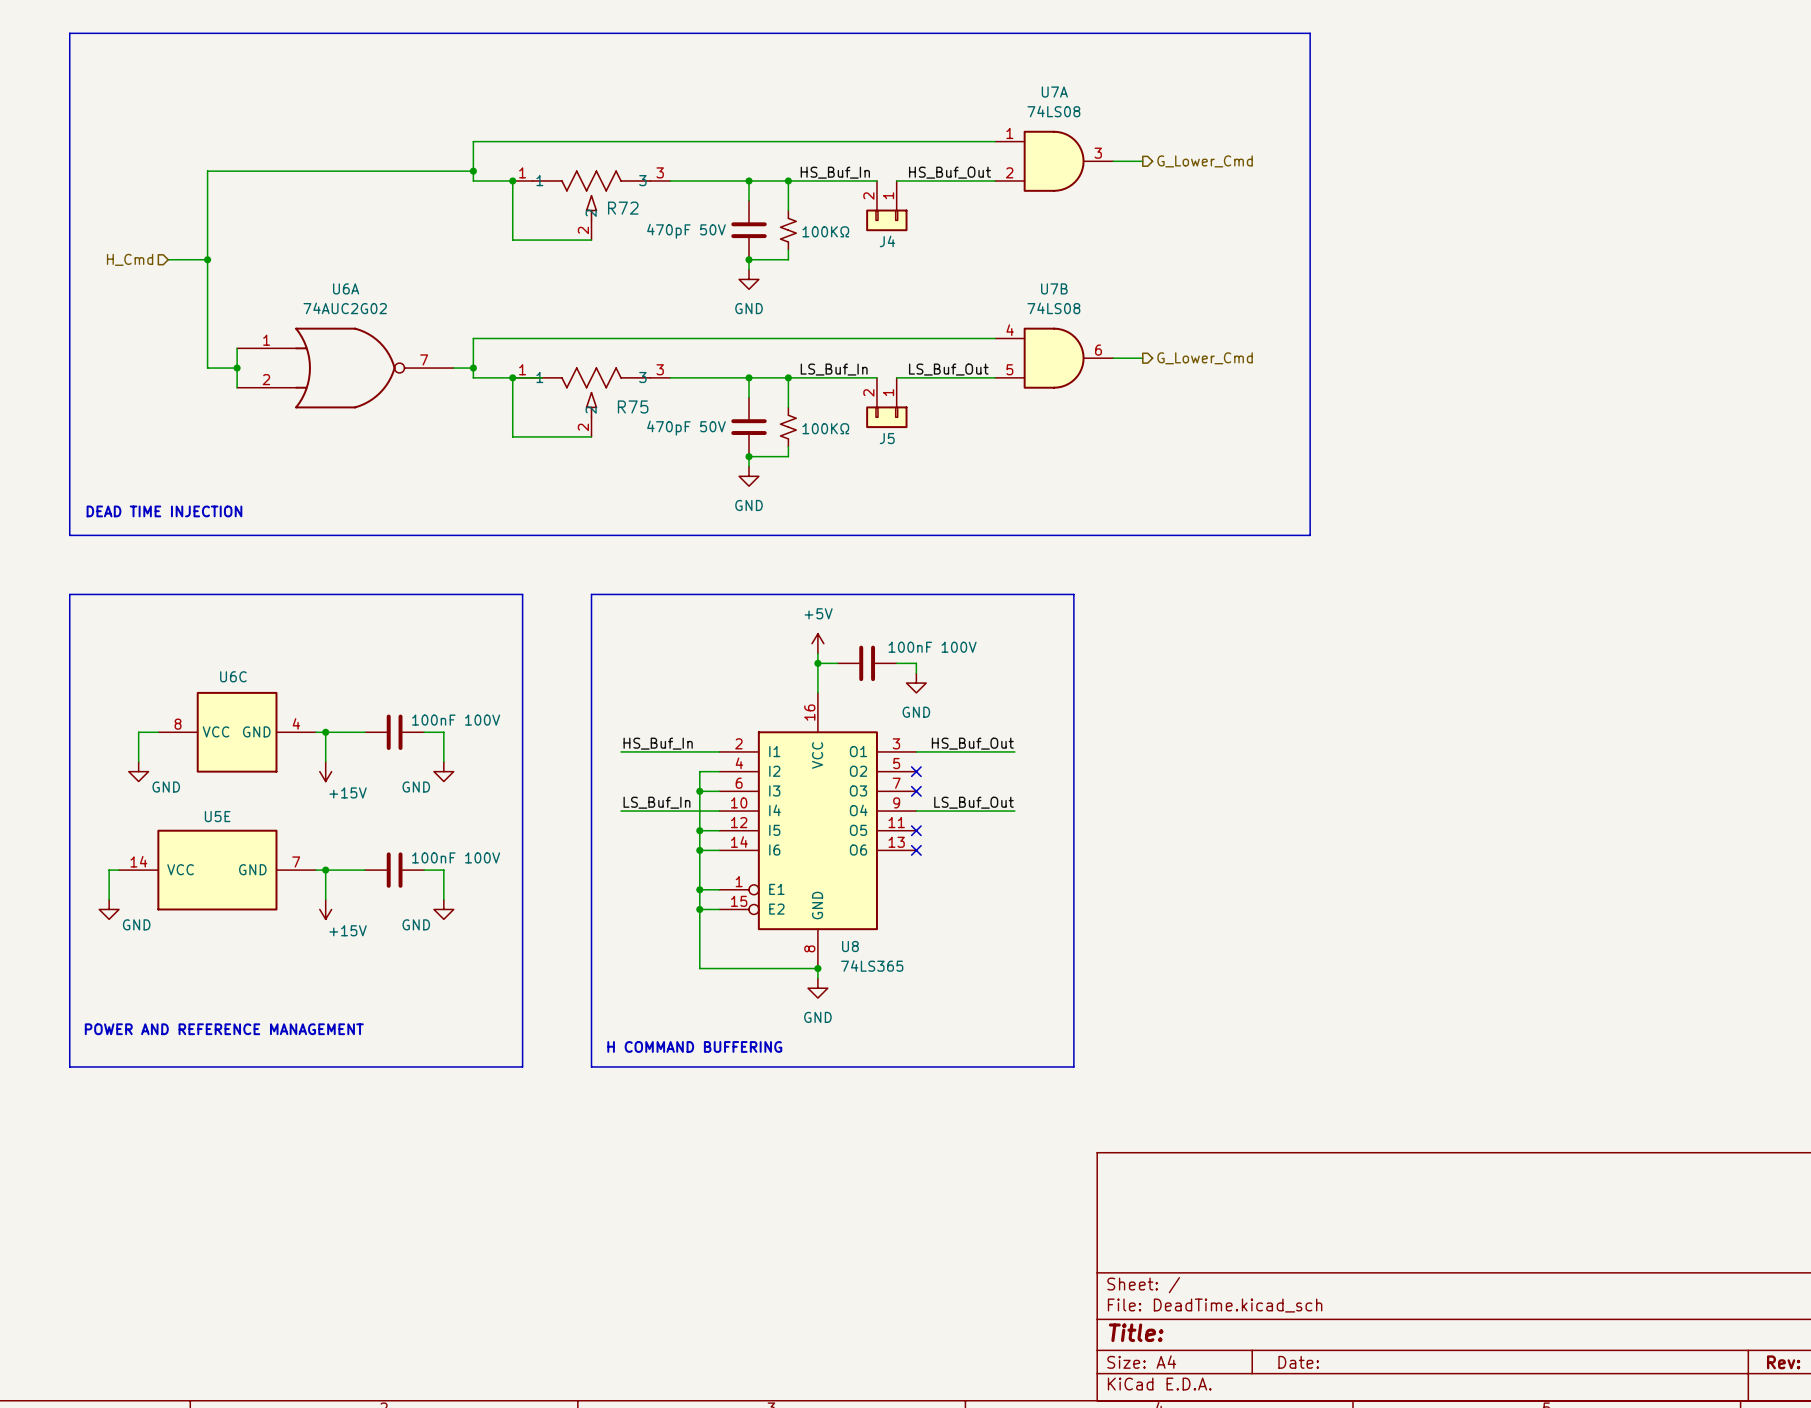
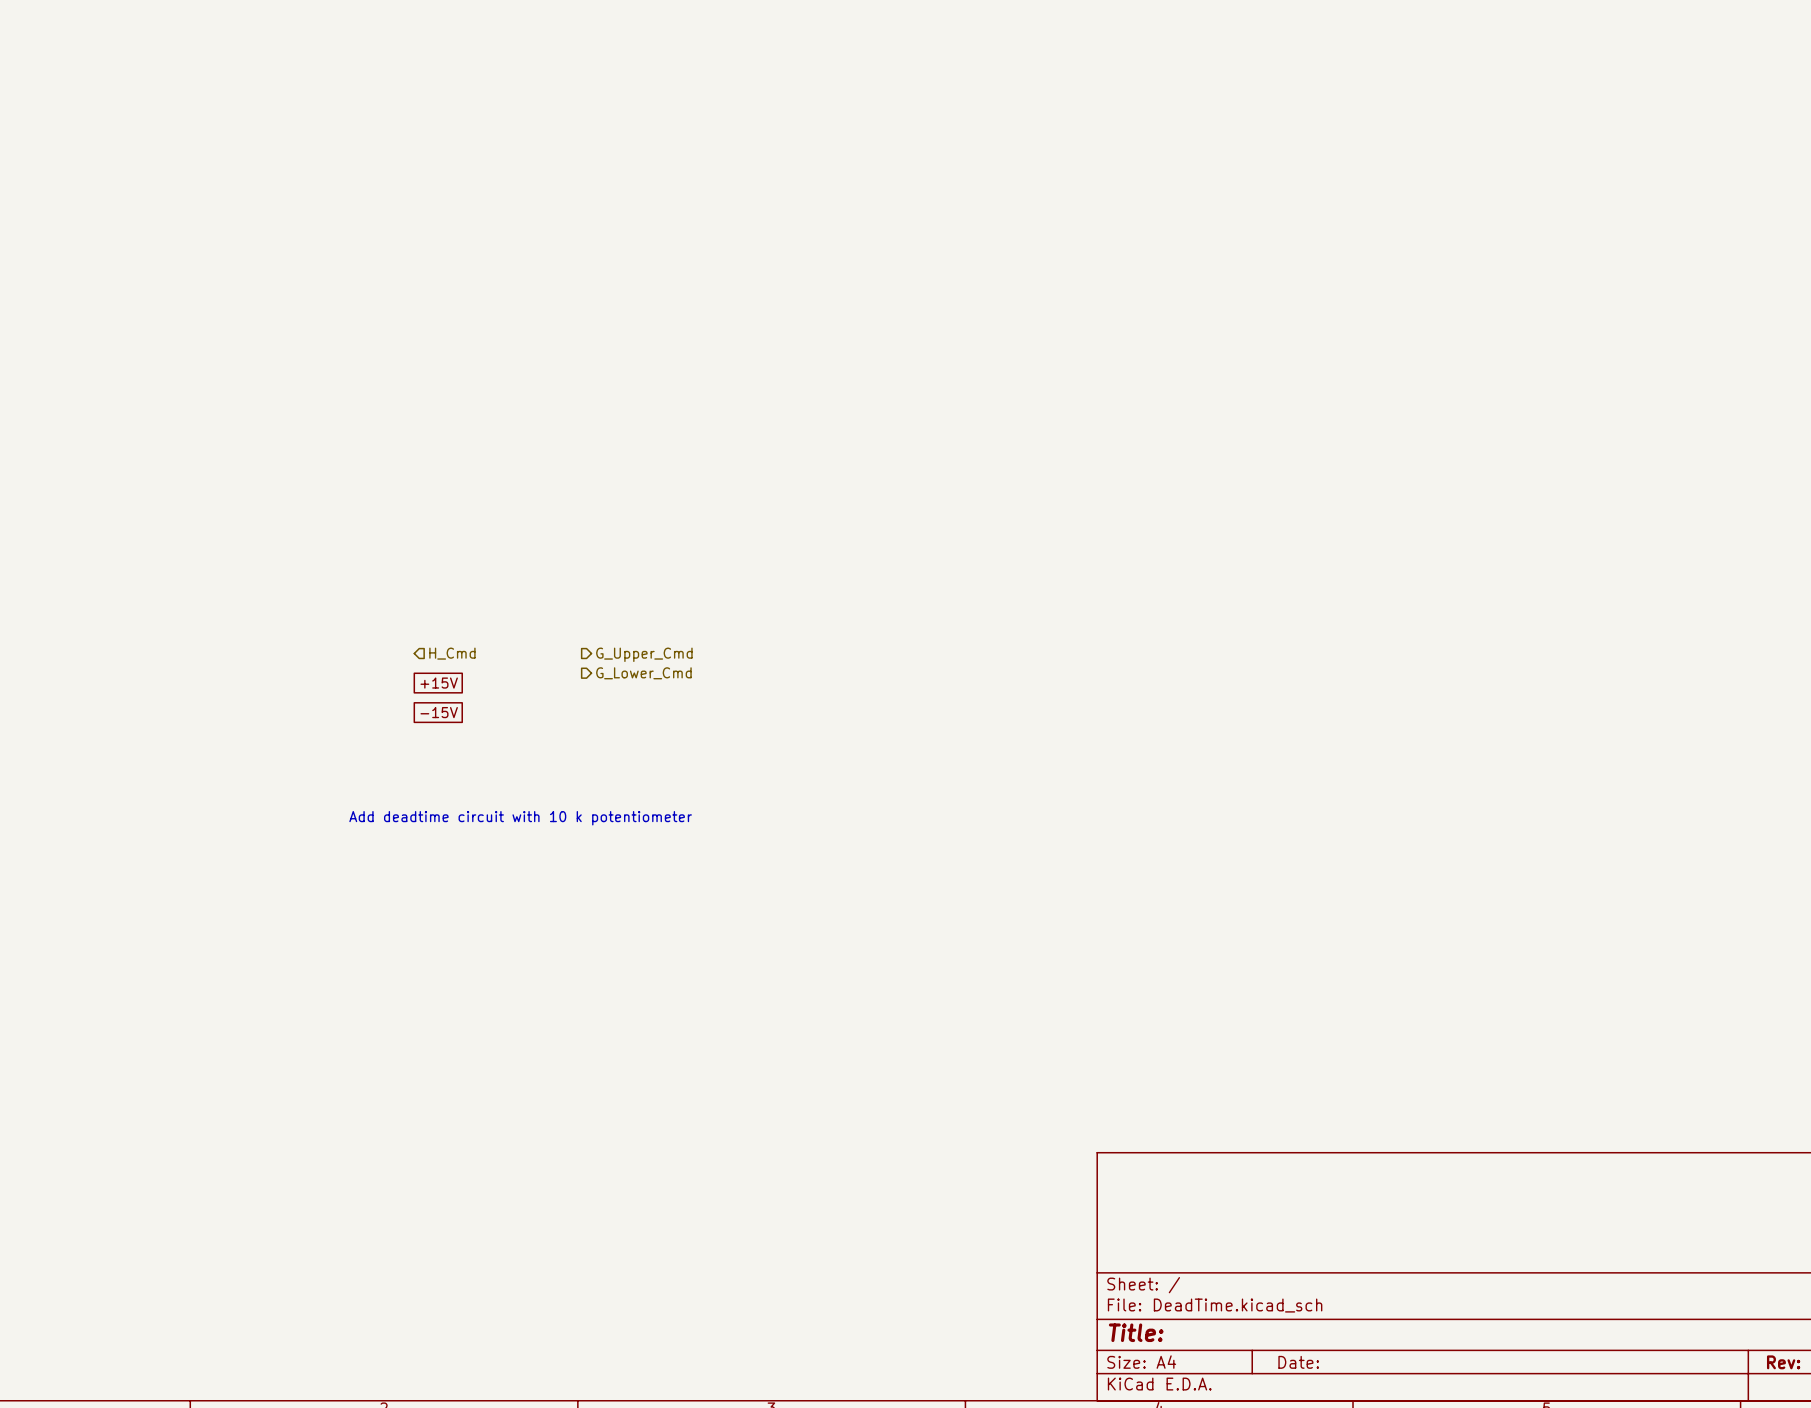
line: (69, 33) (1310, 33) (1310, 535) (69, 535) (69, 33) -> none
wire: (995, 141) (473, 141) (473, 180) (512, 180) (512, 240) (591, 240) -> none
U7A: 74LS08 (1054, 161) -> none
wire: (1113, 161) (1142, 161) -> none
hierarchical label: G_Lower_Cmd (1205, 161) -> none
wire: (473, 171) (207, 171) (207, 368) (237, 368) -> none
junction: (473, 171) -> none
label: HS_Buf_In (835, 172) -> none
label: HS_Buf_Out (949, 172) -> none
junction: (512, 180) -> none
wire: (670, 180) (876, 180) -> none
wire: (749, 180) (749, 200) -> none
junction: (749, 180) -> none
wire: (788, 180) (788, 210) -> none
junction: (788, 180) -> none
wire: (896, 180) (995, 180) -> none
R72: (591, 205) -> none
J4: (886, 206) -> none
part: 470pF 50V (749, 230) -> none
part: 100KΩ (788, 230) -> none
wire: (788, 249) (788, 259) (749, 259) (749, 269) -> none
hierarchical label: H_Cmd (130, 259) -> none
wire: (168, 259) (207, 259) -> none
junction: (207, 259) -> none
junction: (749, 259) -> none
power symbol: GND (749, 279) -> none
wire: (995, 338) (473, 338) (473, 377) (542, 377) -> none
wire: (237, 348) (237, 387) -> none
U7B: 74LS08 (1054, 358) -> none
wire: (1113, 358) (1142, 358) -> none
hierarchical label: G_Lower_Cmd (1205, 358) -> none
junction: (237, 368) -> none
U6A: 74AUC2G02 (345, 368) -> none
wire: (453, 368) (473, 368) -> none
junction: (473, 368) -> none
label: LS_Buf_In (834, 369) -> none
label: LS_Buf_Out (948, 369) -> none
wire: (512, 377) (512, 436) (591, 436) -> none
junction: (512, 377) -> none
wire: (670, 377) (876, 377) -> none
wire: (749, 377) (749, 397) -> none
junction: (749, 377) -> none
wire: (788, 377) (788, 407) -> none
junction: (788, 377) -> none
wire: (896, 377) (995, 377) -> none
R75: (591, 402) -> none
J5: (886, 402) -> none
part: 470pF 50V (749, 427) -> none
part: 100KΩ (788, 427) -> none
wire: (788, 446) (788, 456) (749, 456) (749, 466) -> none
junction: (749, 456) -> none
power symbol: GND (749, 476) -> none
text: DEAD TIME INJECTION (164, 511) -> none
line: (69, 594) (69, 1066) (522, 1066) (522, 594) (69, 594) -> none
line: (591, 594) (1073, 594) (1073, 1066) (591, 1066) (591, 594) -> none
power symbol: +5V (817, 643) -> none
hierarchical label: none -> H_Cmd (452, 653)
wire: (817, 653) (817, 692) -> none
hierarchical label: none -> G_Upper_Cmd (644, 654)
wire: (817, 663) (837, 663) -> none
junction: (817, 663) -> none
part: 100nF 100V (867, 663) -> none
wire: (896, 663) (916, 663) (916, 673) -> none
hierarchical label: none -> G_Lower_Cmd (643, 673)
global label: none -> +15V (439, 683)
power symbol: GND (916, 683) -> none
global label: none -> -15V (439, 712)
wire: (158, 732) (138, 732) (138, 761) -> none
U6C: (237, 732) -> none
wire: (315, 732) (365, 732) -> none
wire: (325, 732) (325, 761) -> none
junction: (325, 732) -> none
part: 100nF 100V (394, 732) -> none
wire: (424, 732) (443, 732) (443, 761) -> none
label: HS_Buf_In (658, 743) -> none
label: HS_Buf_Out (972, 743) -> none
wire: (621, 751) (719, 751) -> none
wire: (916, 751) (1014, 751) -> none
power symbol: GND (138, 771) -> none
power symbol: +15V (325, 771) -> none
power symbol: GND (443, 771) -> none
wire: (719, 771) (699, 771) (699, 968) (817, 968) (817, 978) -> none
no-connect mark: (916, 771) -> none
wire: (699, 791) (719, 791) -> none
junction: (699, 791) -> none
no-connect mark: (916, 791) -> none
label: LS_Buf_In (656, 802) -> none
label: LS_Buf_Out (973, 802) -> none
wire: (621, 811) (719, 811) -> none
wire: (916, 811) (1014, 811) -> none
text: none -> Add deadtime circuit with 10 k potentiometer (520, 818)
wire: (699, 830) (719, 830) -> none
junction: (699, 830) -> none
U8: 74LS365 (817, 830) -> none
no-connect mark: (916, 830) -> none
wire: (699, 850) (719, 850) -> none
junction: (699, 850) -> none
no-connect mark: (916, 850) -> none
wire: (118, 870) (109, 870) (109, 899) -> none
U5E: (217, 870) -> none
wire: (315, 870) (365, 870) -> none
wire: (325, 870) (325, 899) -> none
junction: (325, 870) -> none
part: 100nF 100V (394, 870) -> none
wire: (424, 870) (443, 870) (443, 899) -> none
wire: (699, 889) (719, 889) -> none
junction: (699, 889) -> none
power symbol: GND (109, 909) -> none
power symbol: +15V (325, 909) -> none
power symbol: GND (443, 909) -> none
wire: (699, 909) (719, 909) -> none
junction: (699, 909) -> none
junction: (817, 968) -> none
power symbol: GND (817, 988) -> none
text: POWER AND REFERENCE MANAGEMENT (224, 1029) -> none
text: H COMMAND BUFFERING (694, 1046) -> none

